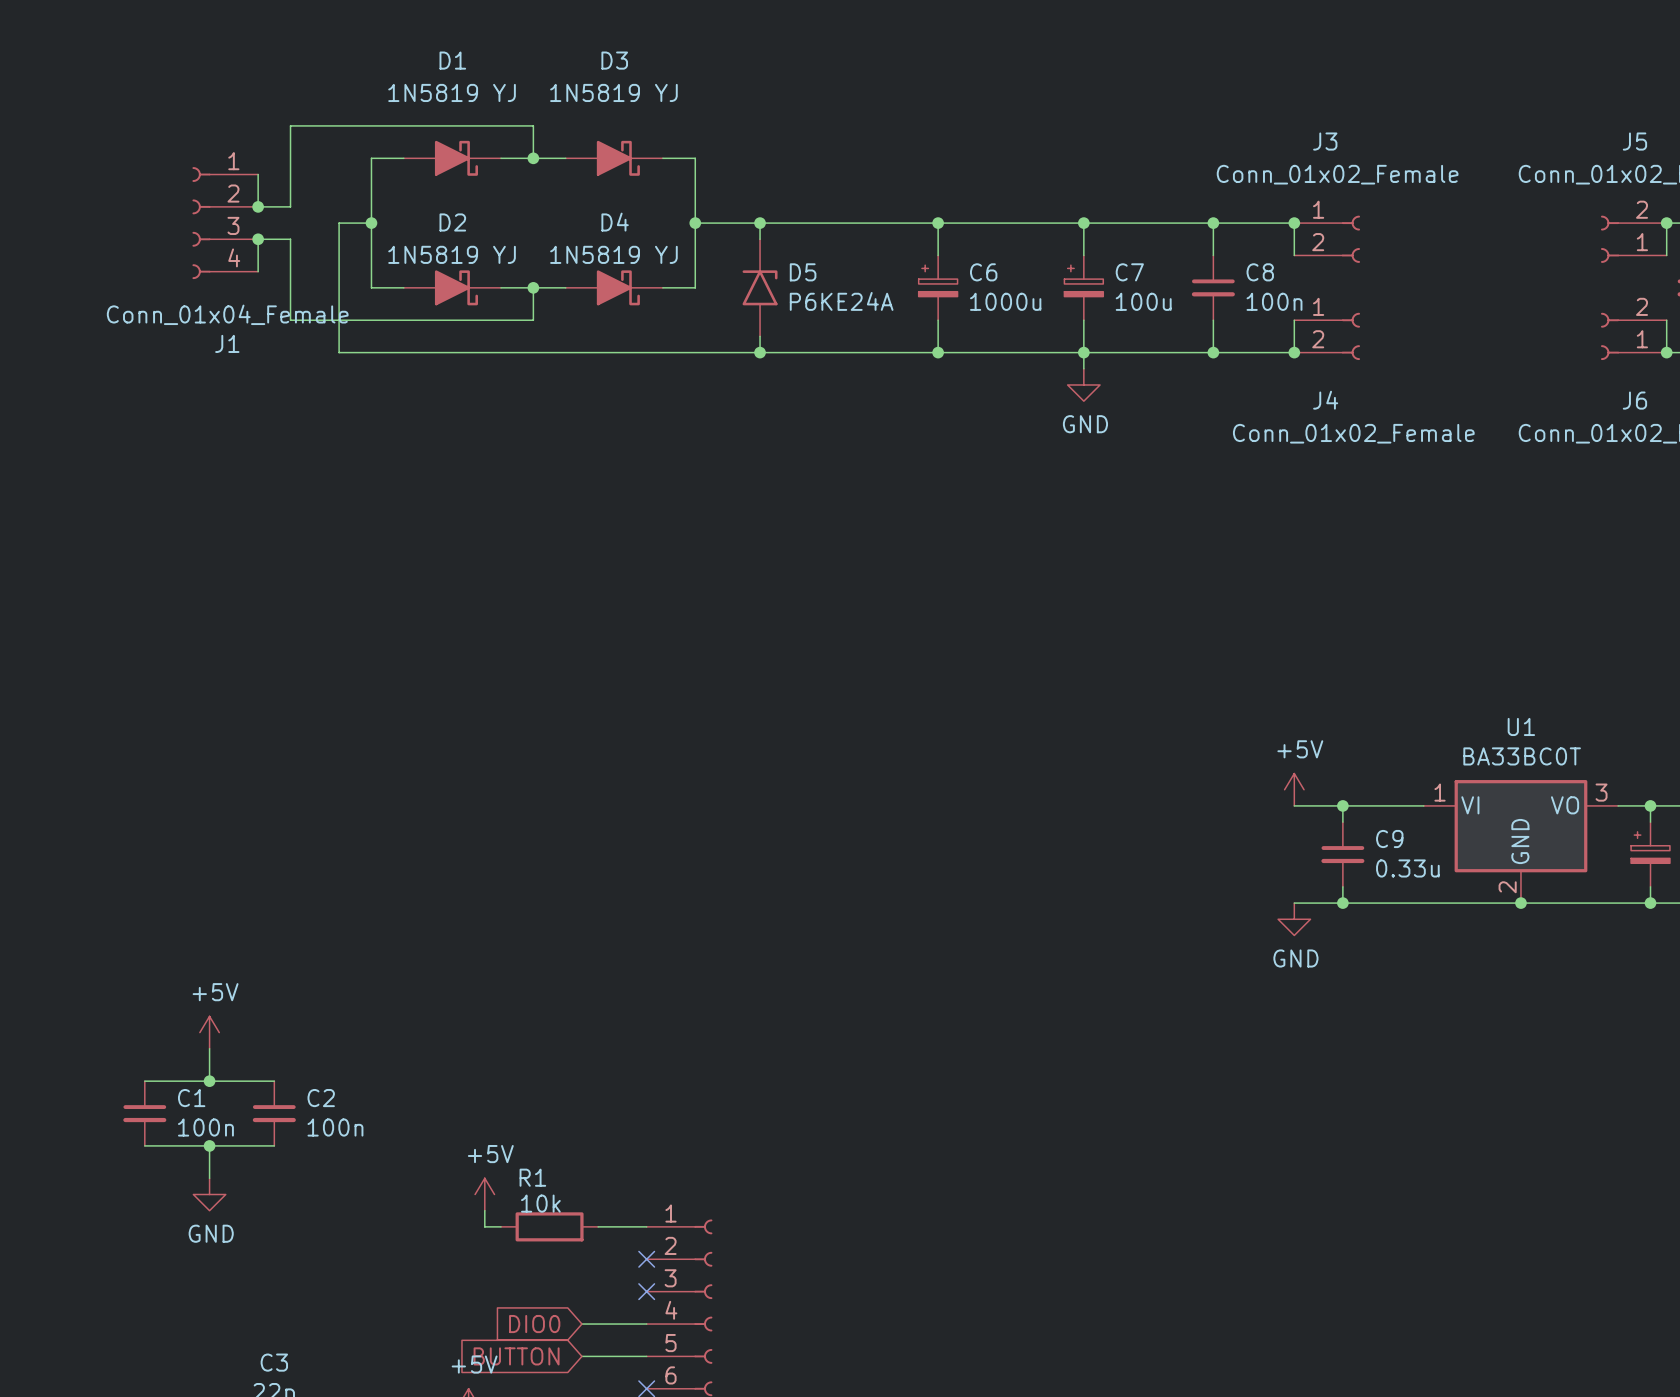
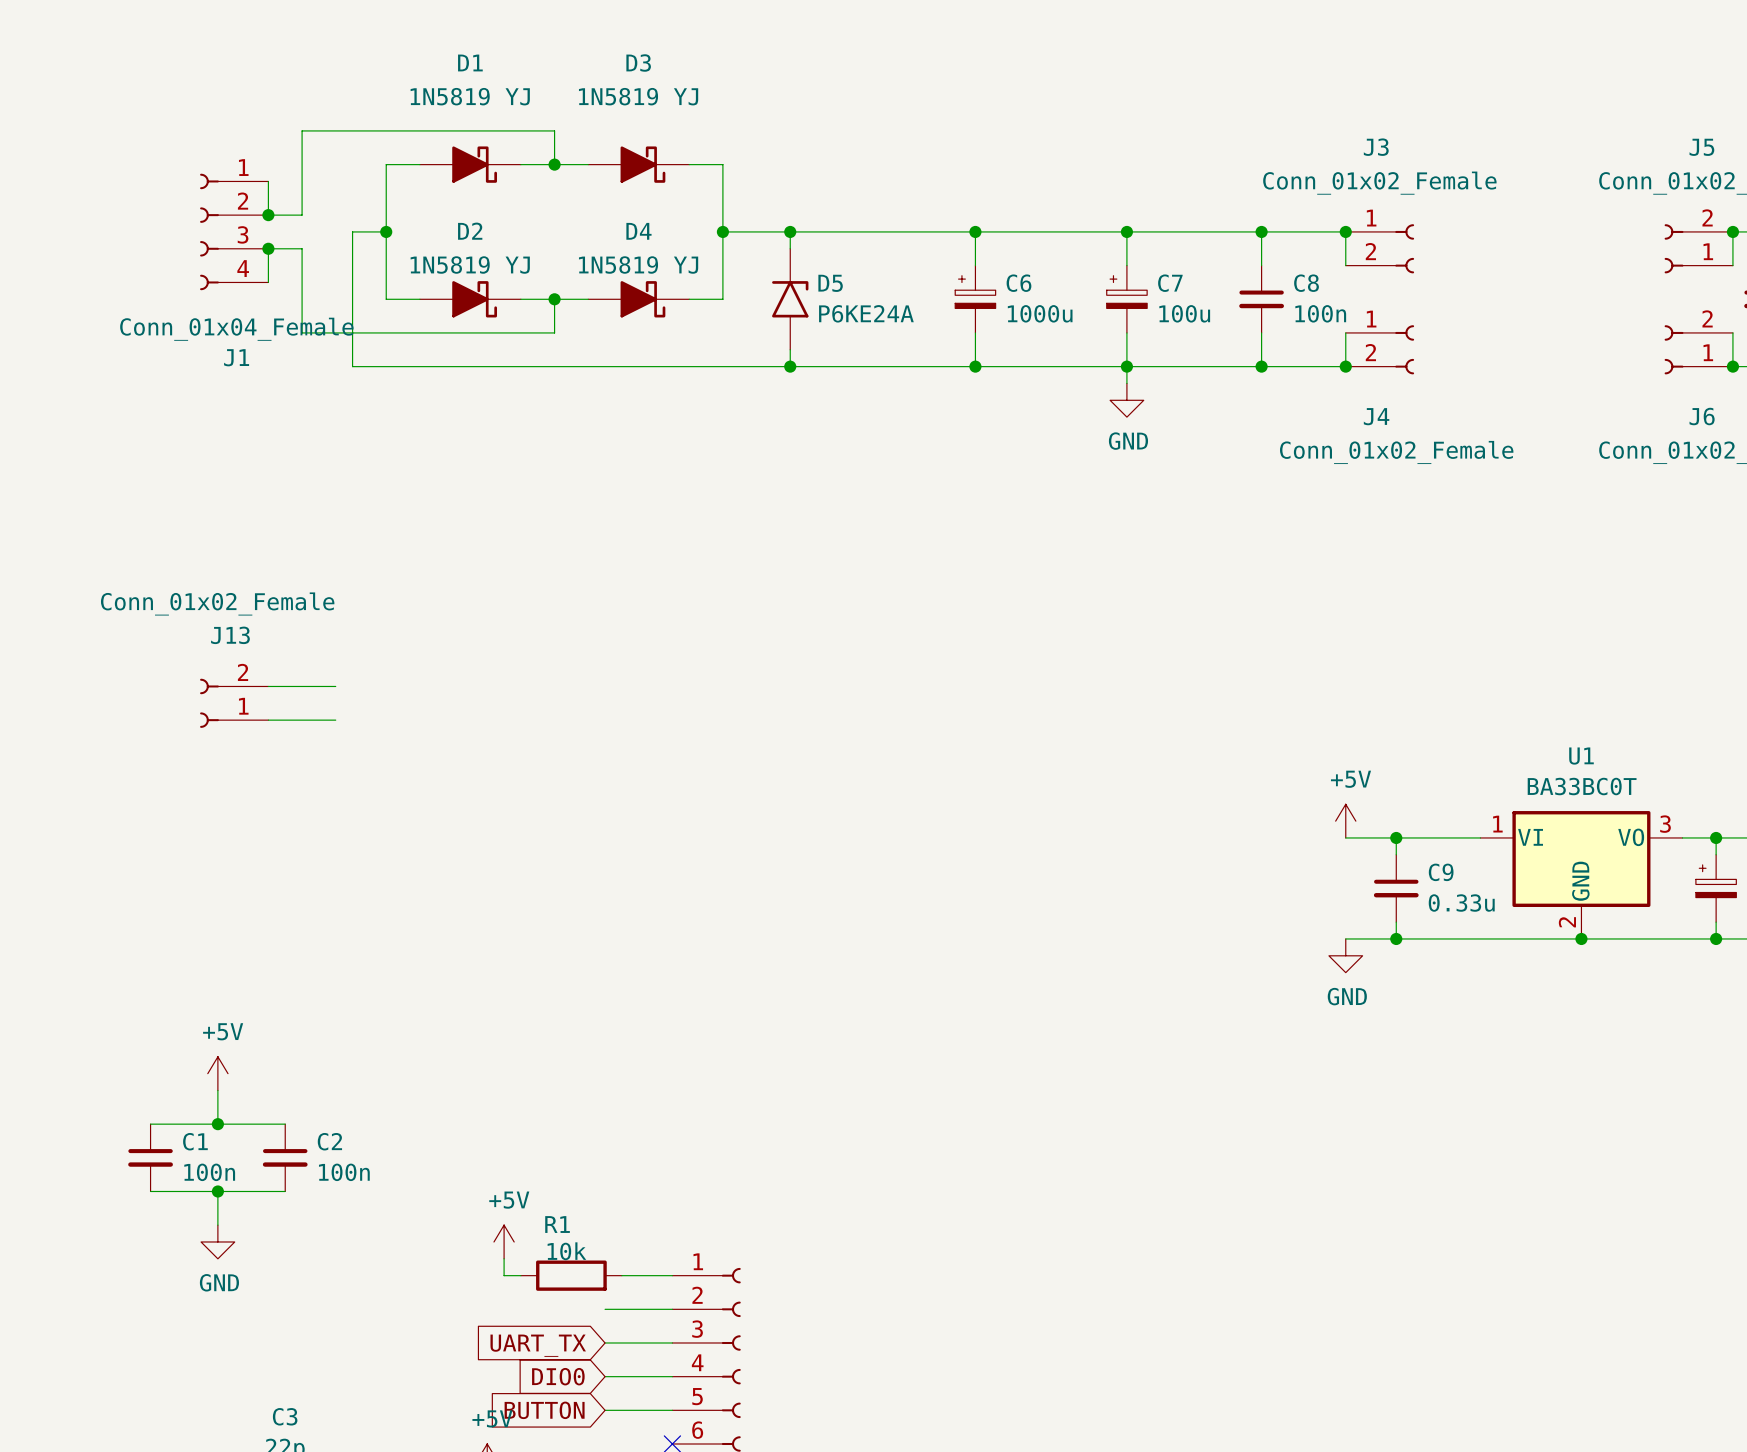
wire: none -> (268, 686) (335, 686)
J13: none -> Conn_01x02_Female (234, 703)
wire: none -> (268, 720) (335, 720)
wire: none -> (605, 1309) (672, 1309)
no-connect mark: (646, 1259) -> none
wire: none -> (605, 1342) (672, 1342)
no-connect mark: (646, 1291) -> none
global label: none -> UART_TX (538, 1345)

